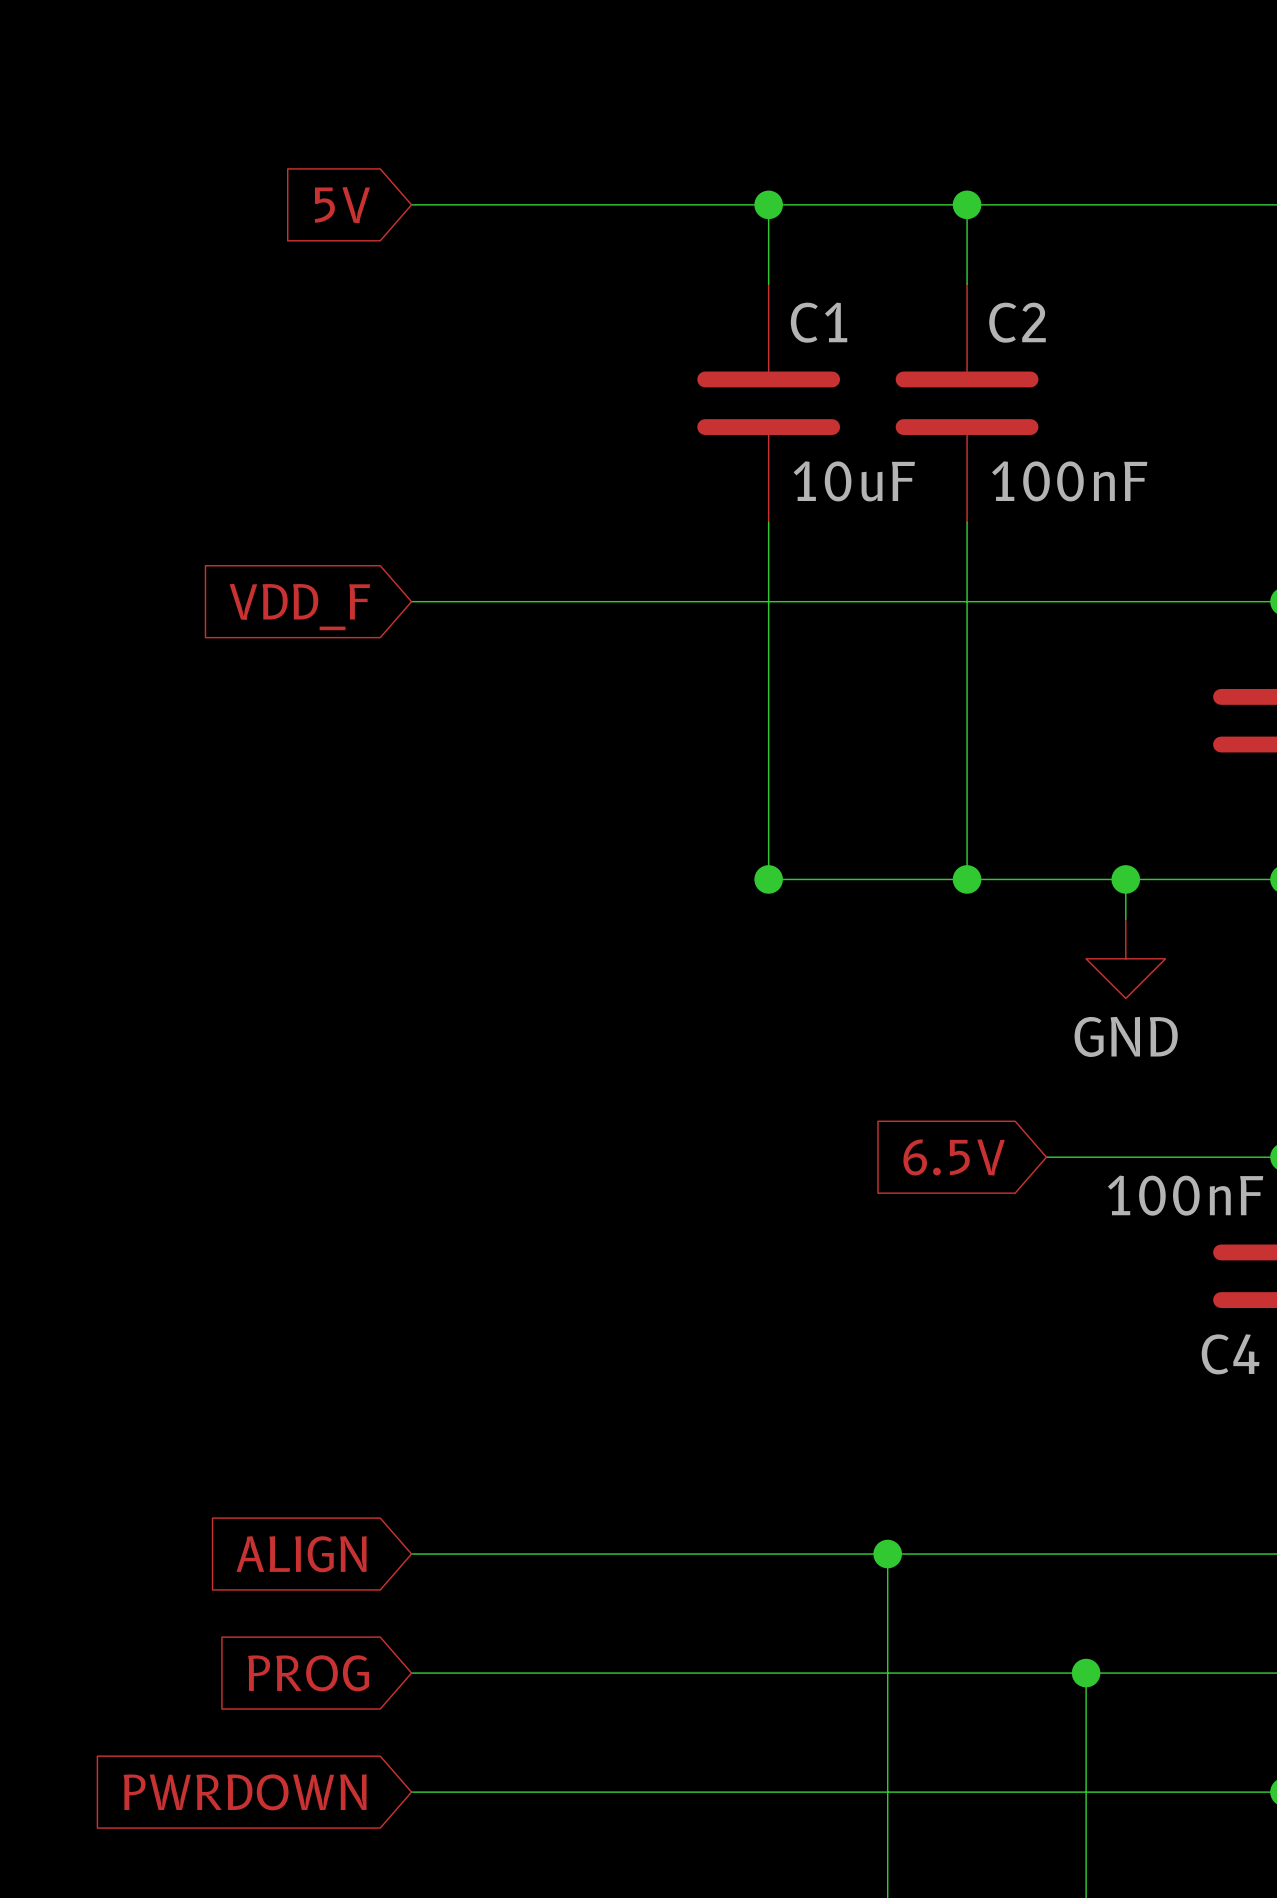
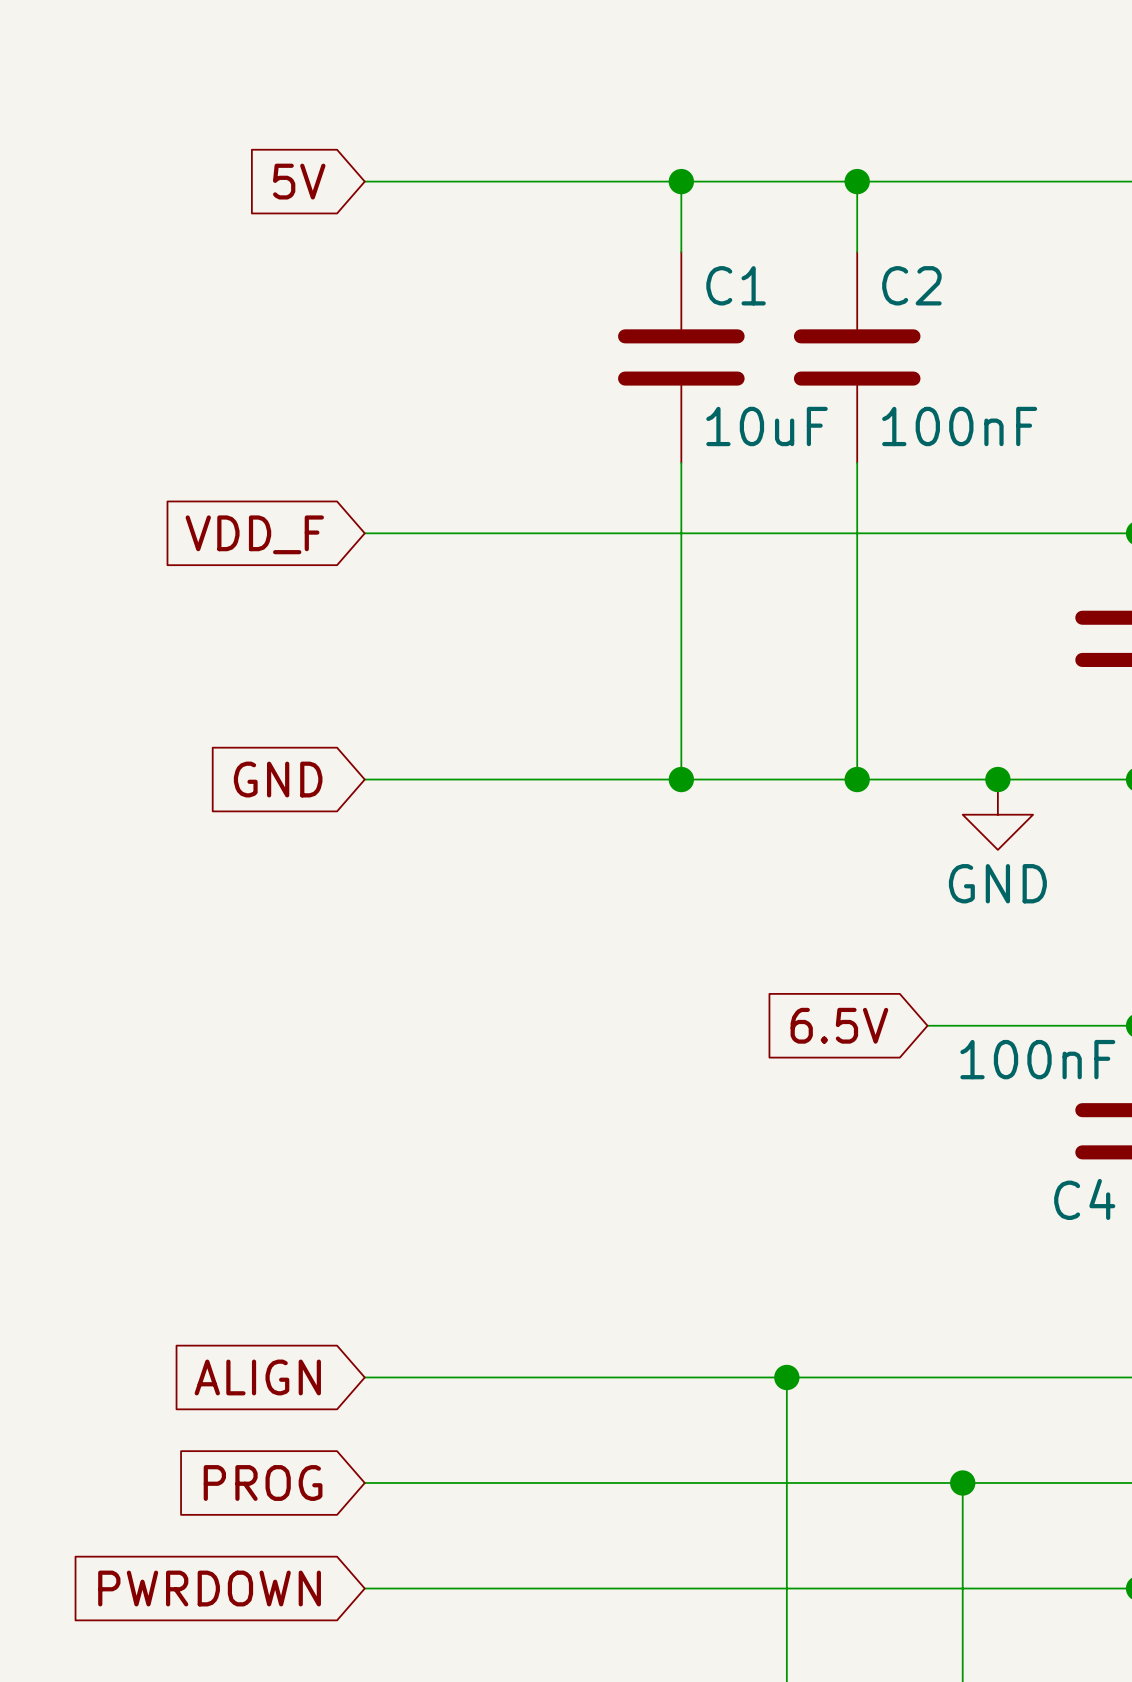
global label: none -> GND (278, 779)
wire: none -> (364, 779) (681, 779)
power symbol position: GND (1125, 958) -> GND (997, 814)

